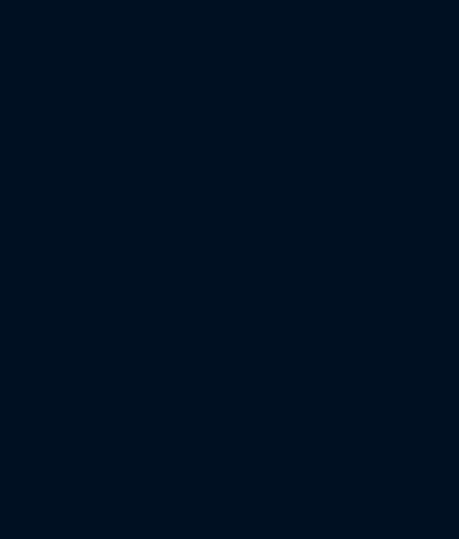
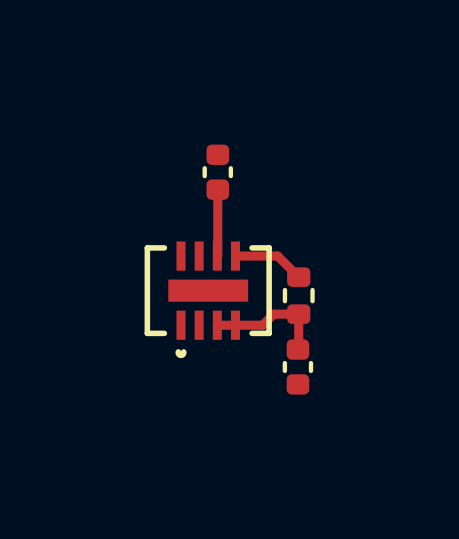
part: none -> (217, 172)
top track: none -> (217, 189) (217, 255)
top track: none -> (235, 256) (277, 256) (298, 277)
part: none -> (298, 295)
part: none -> (208, 299)
top track: none -> (217, 325) (262, 325) (273, 314) (298, 314) (297, 349)
part: none -> (297, 366)

